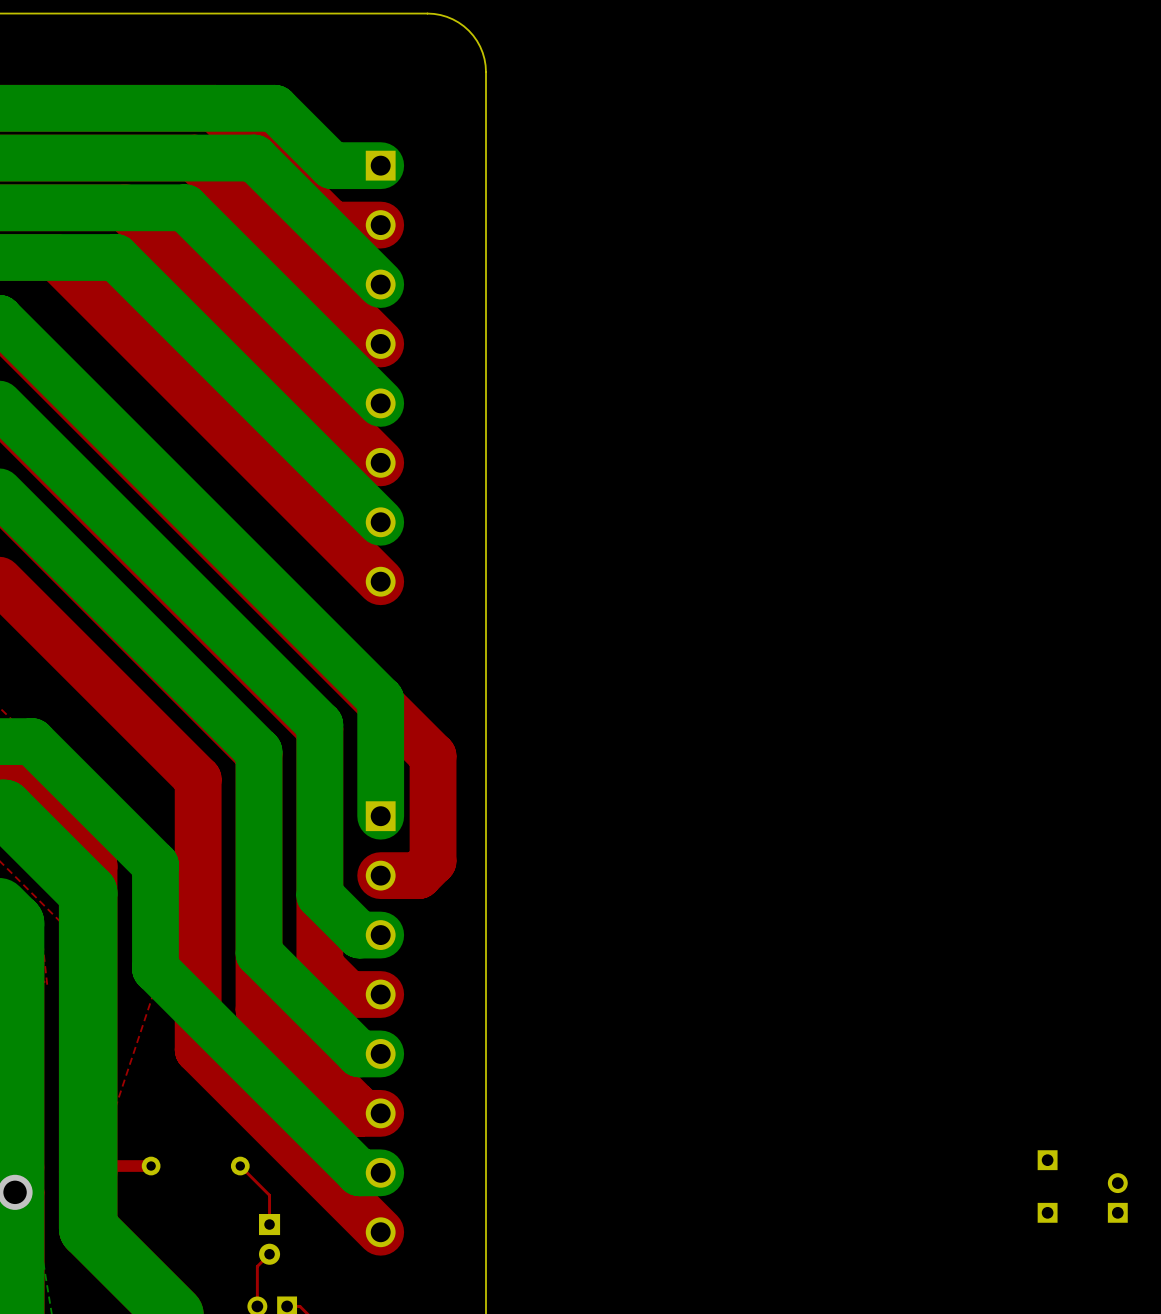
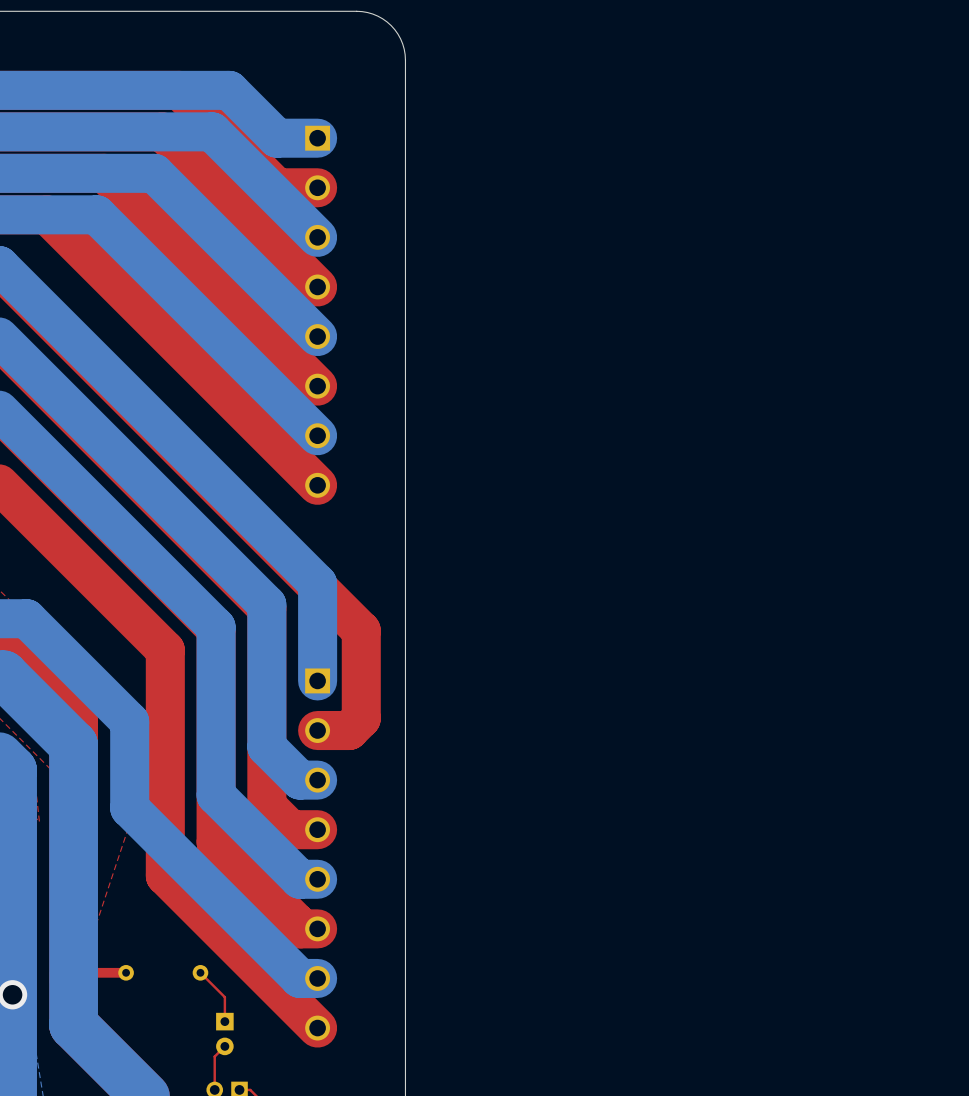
part: (1047, 1160) -> none
part: (1117, 1197) -> none
part: (1047, 1212) -> none

